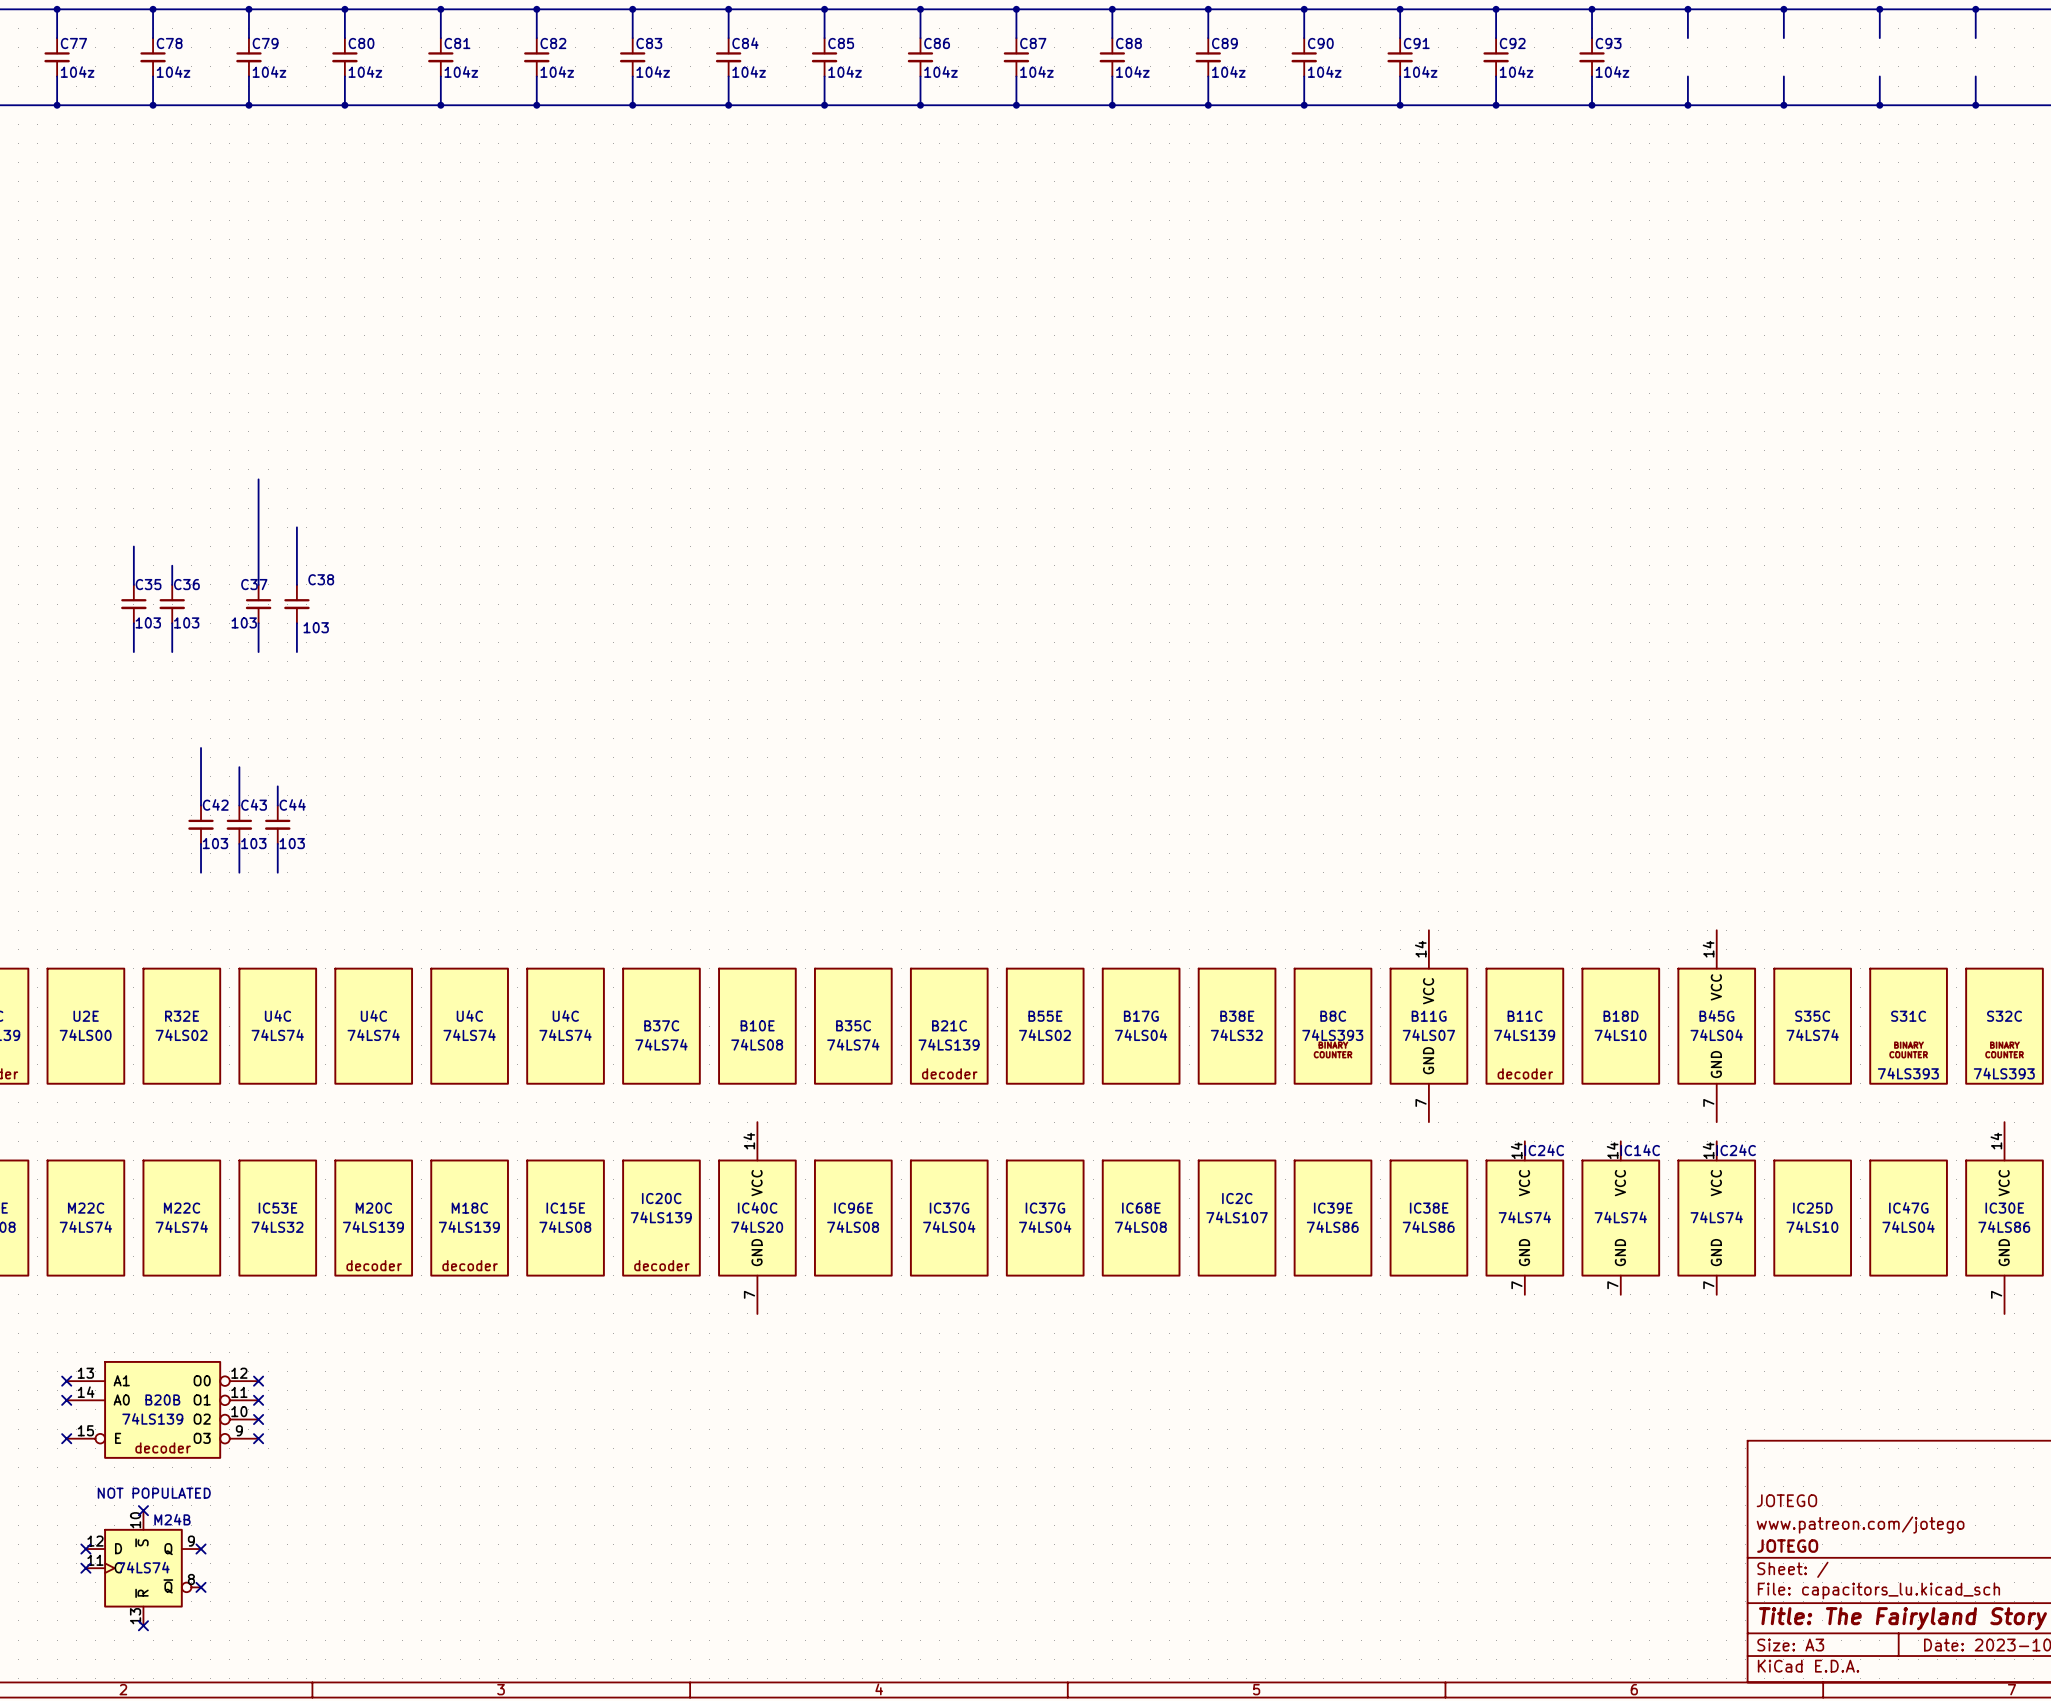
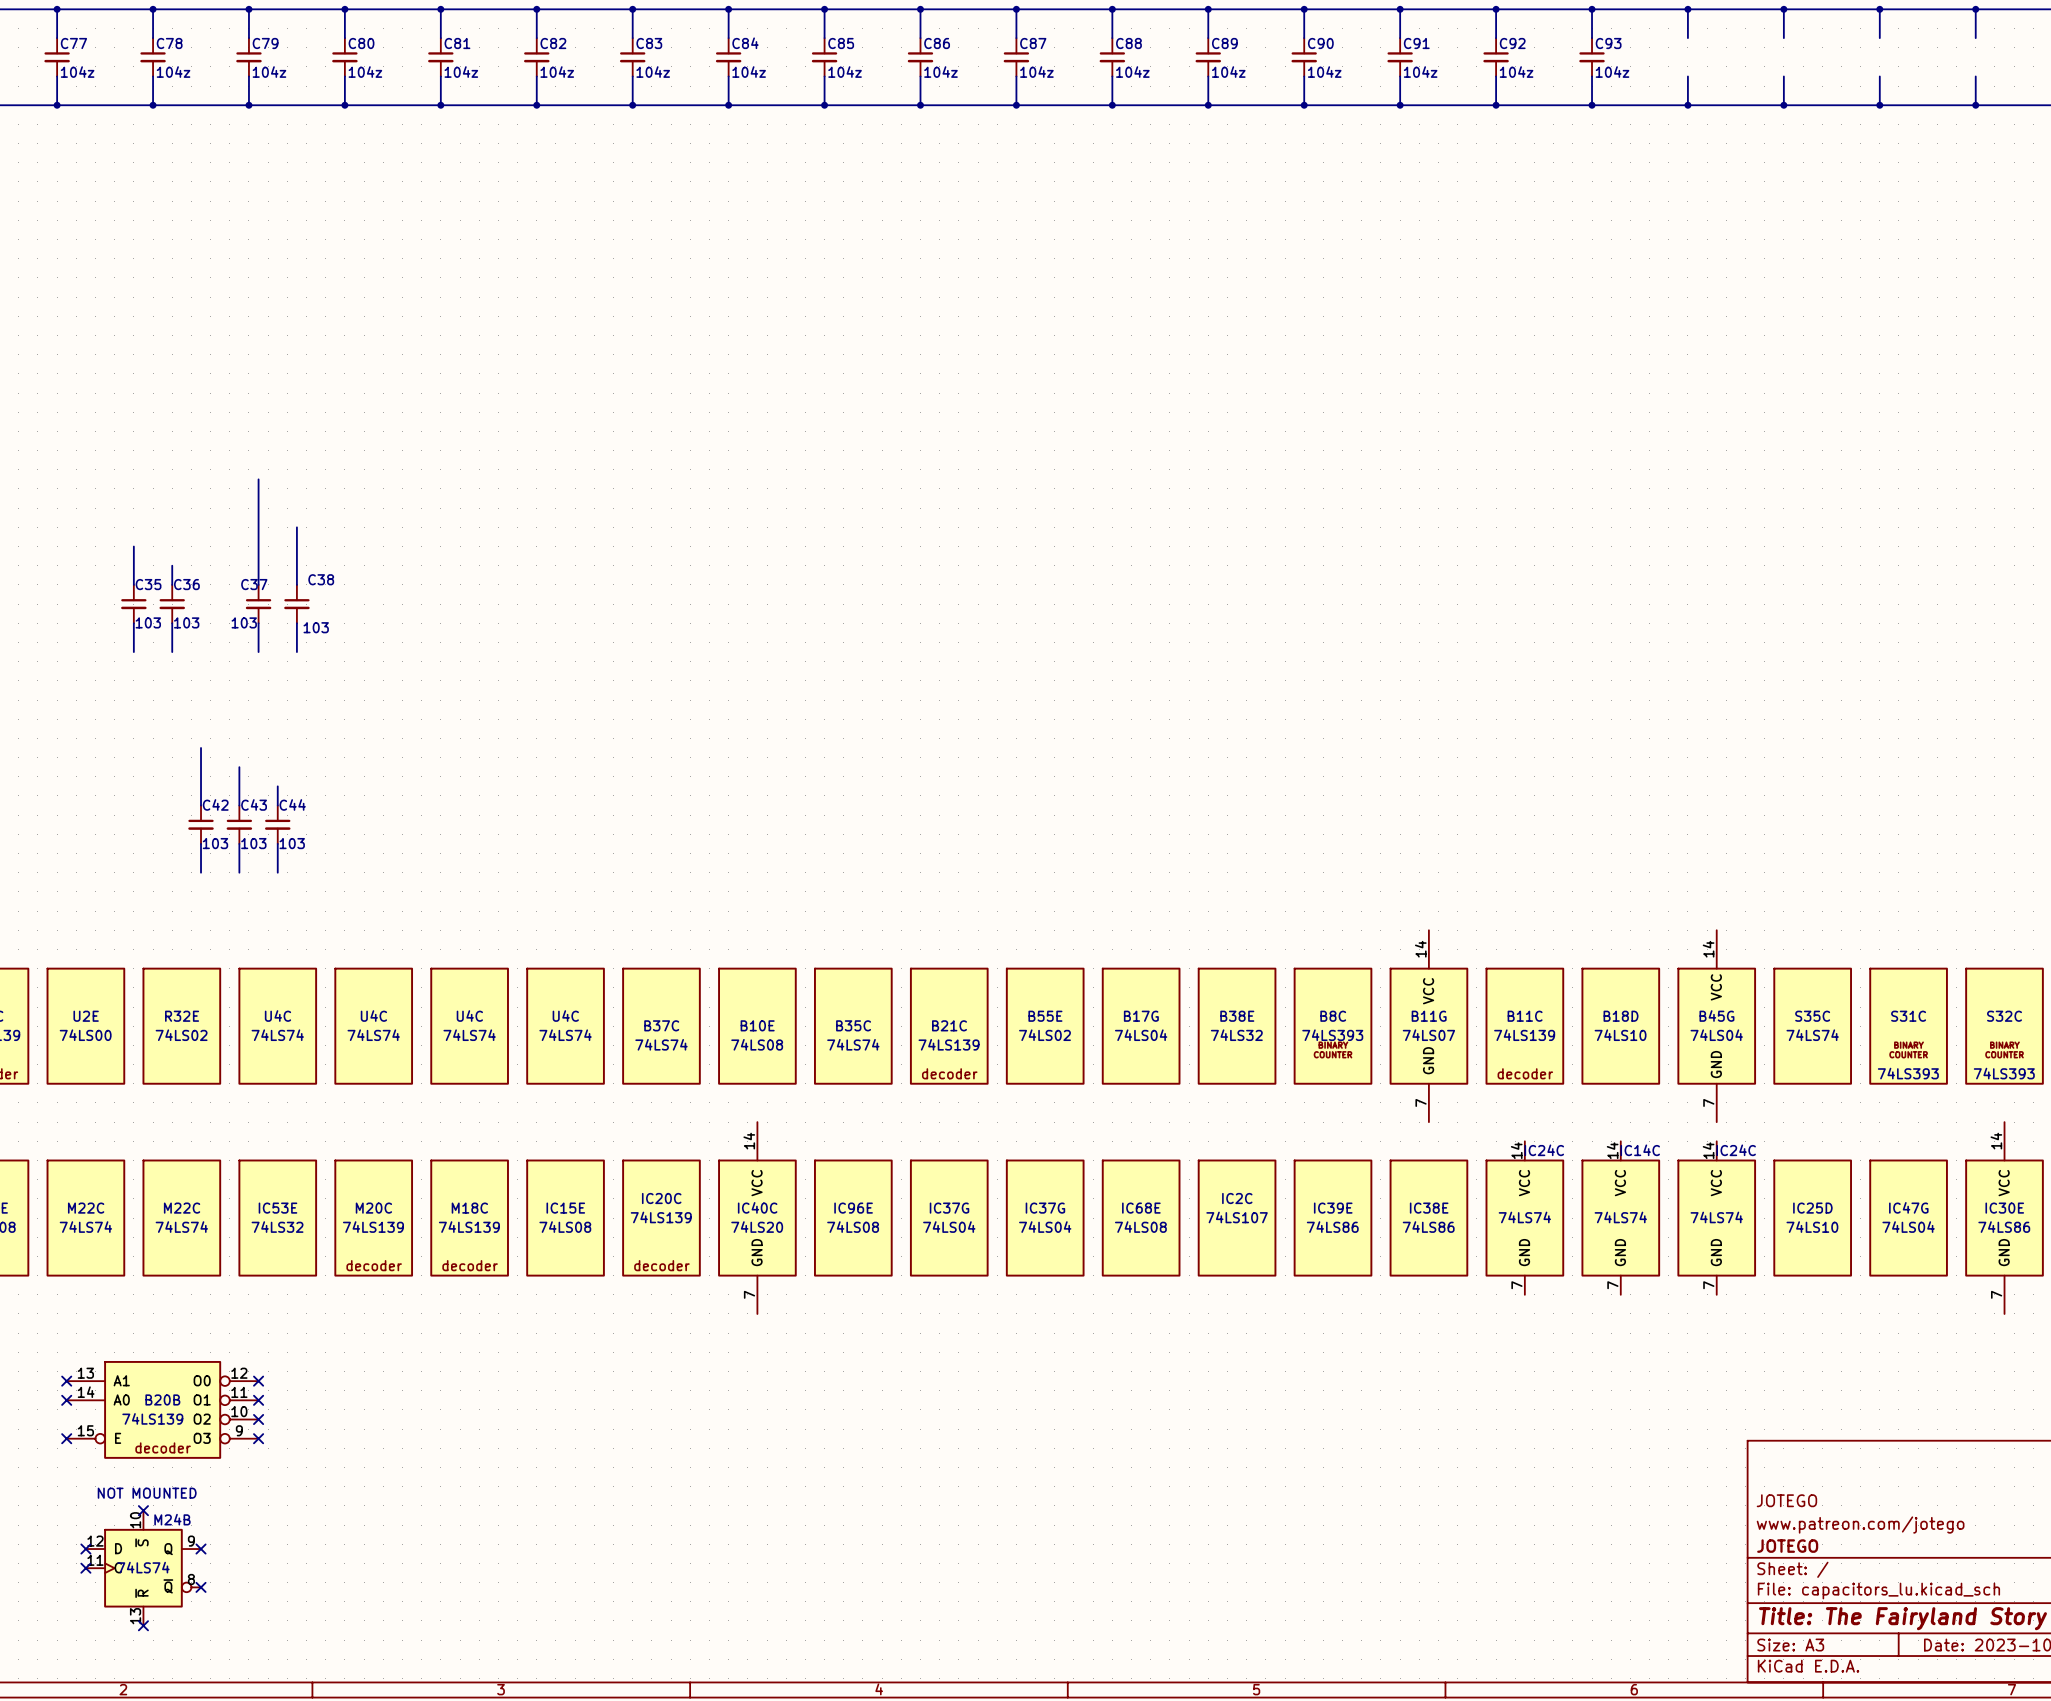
text: NOT POPULATED (154, 1493) -> NOT MOUNTED (147, 1493)

